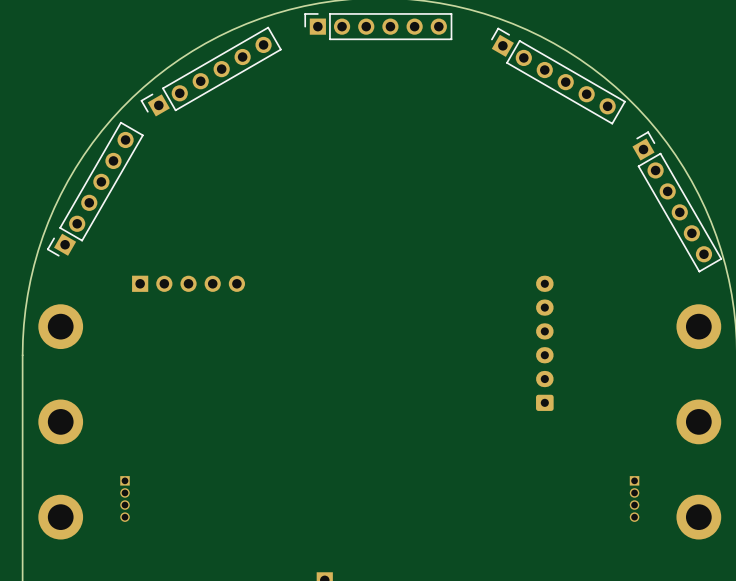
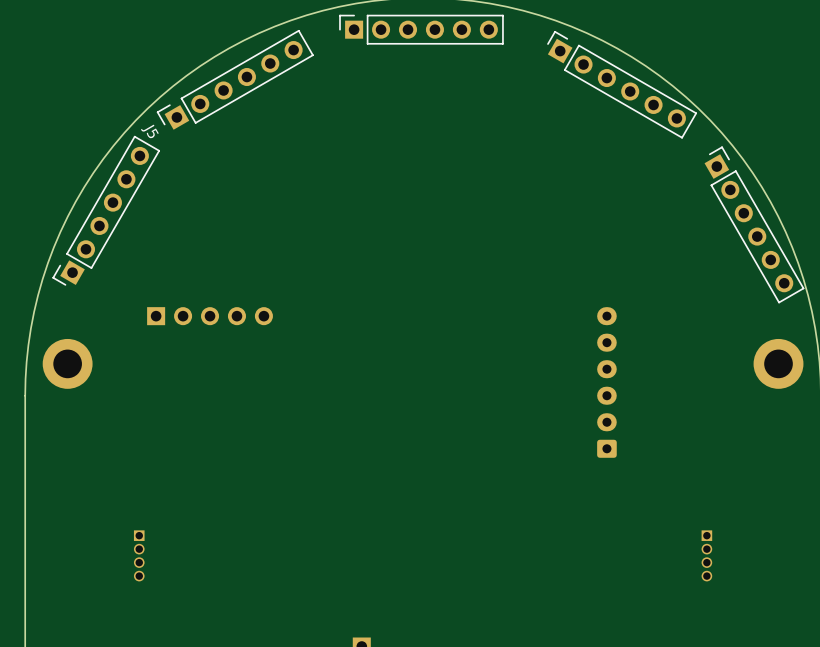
J5 name: none -> J5 (149, 131)
part: (60, 421) -> none
part: (698, 421) -> none
part: (60, 517) -> none
part: (698, 517) -> none

